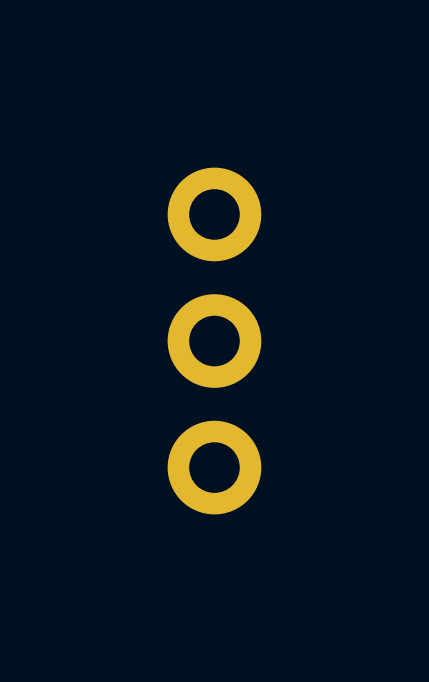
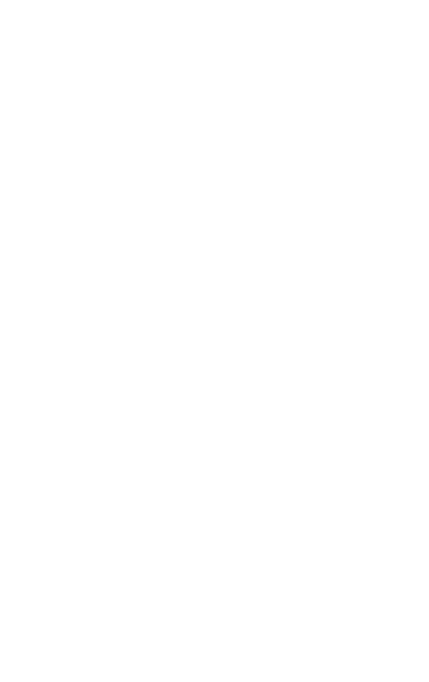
part: (214, 341) -> none

